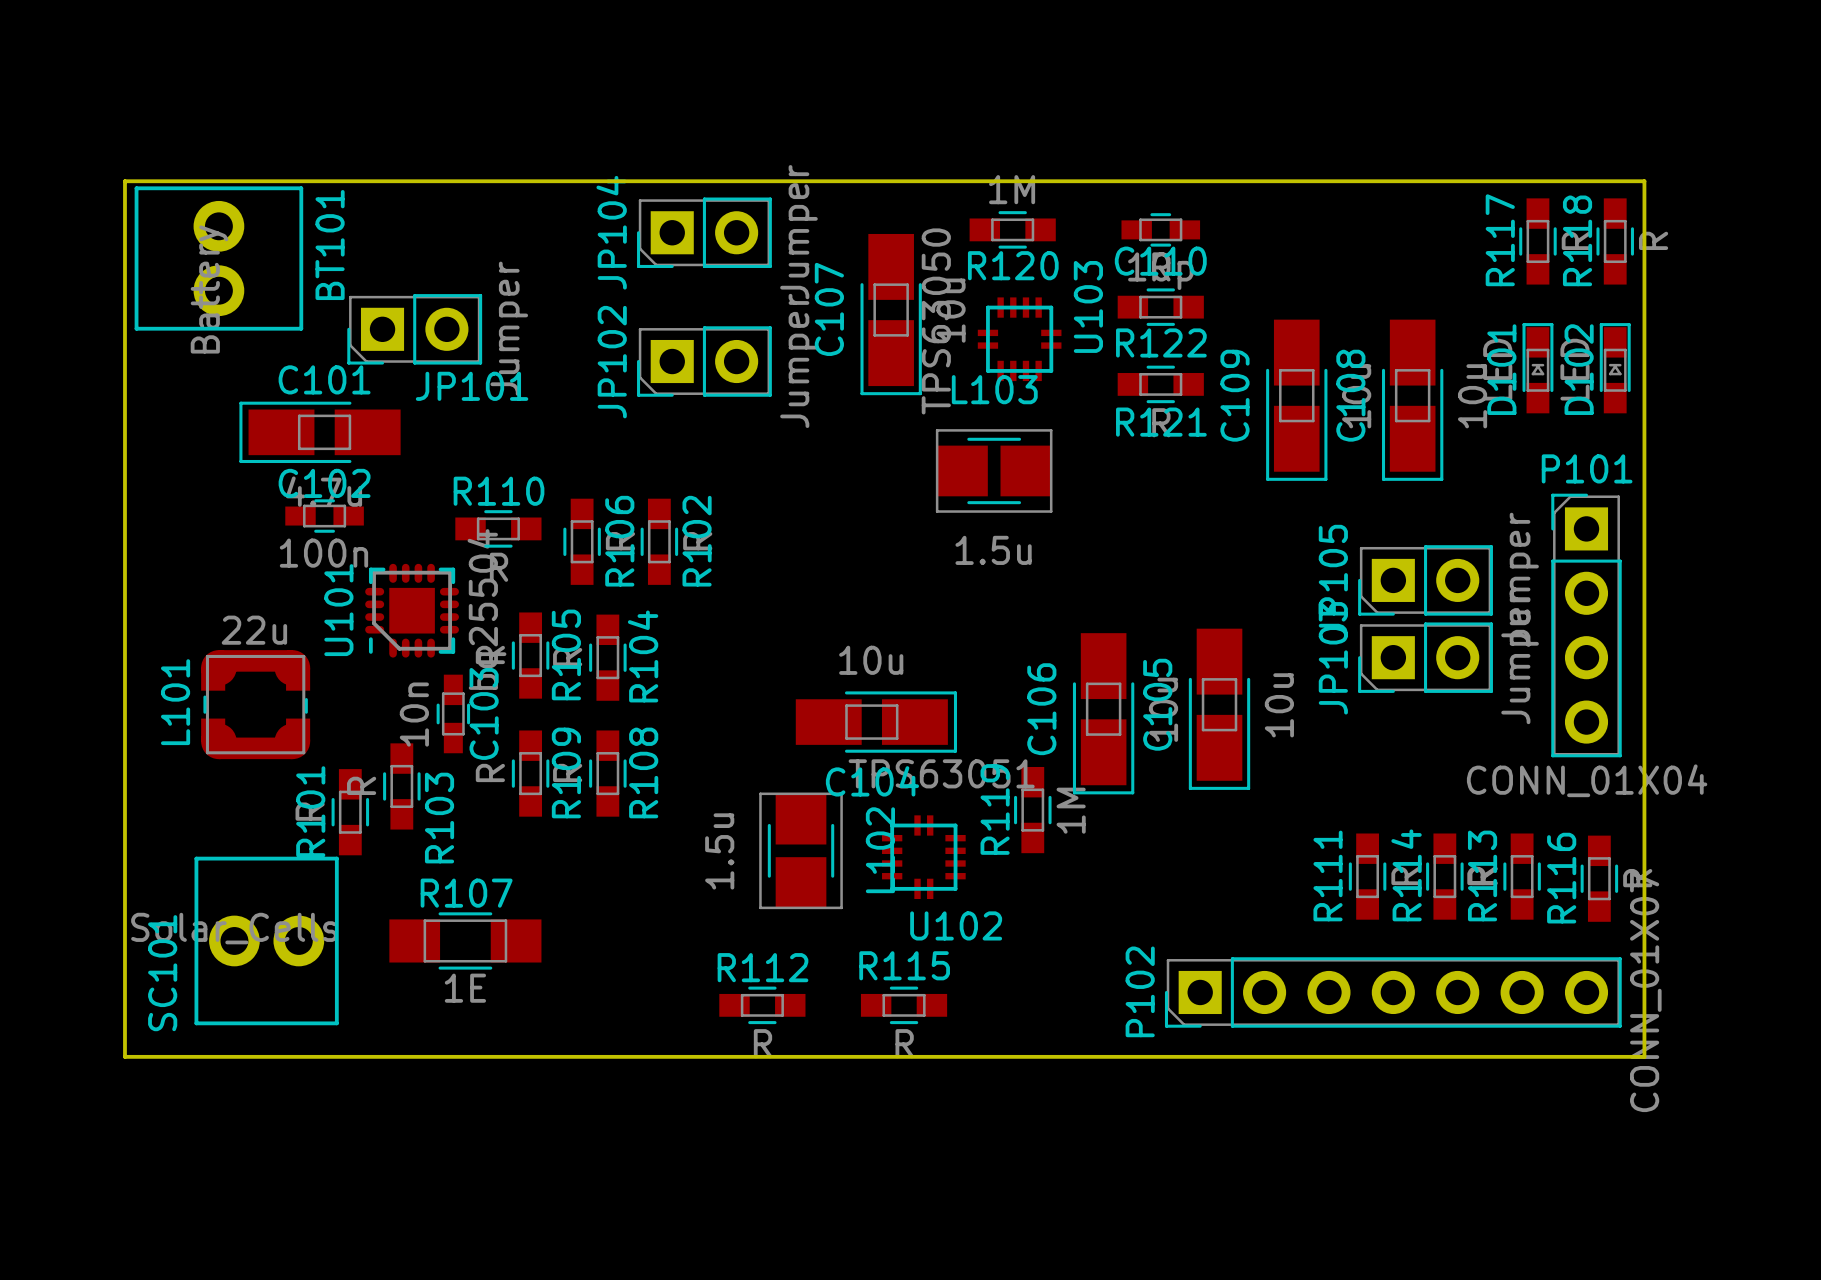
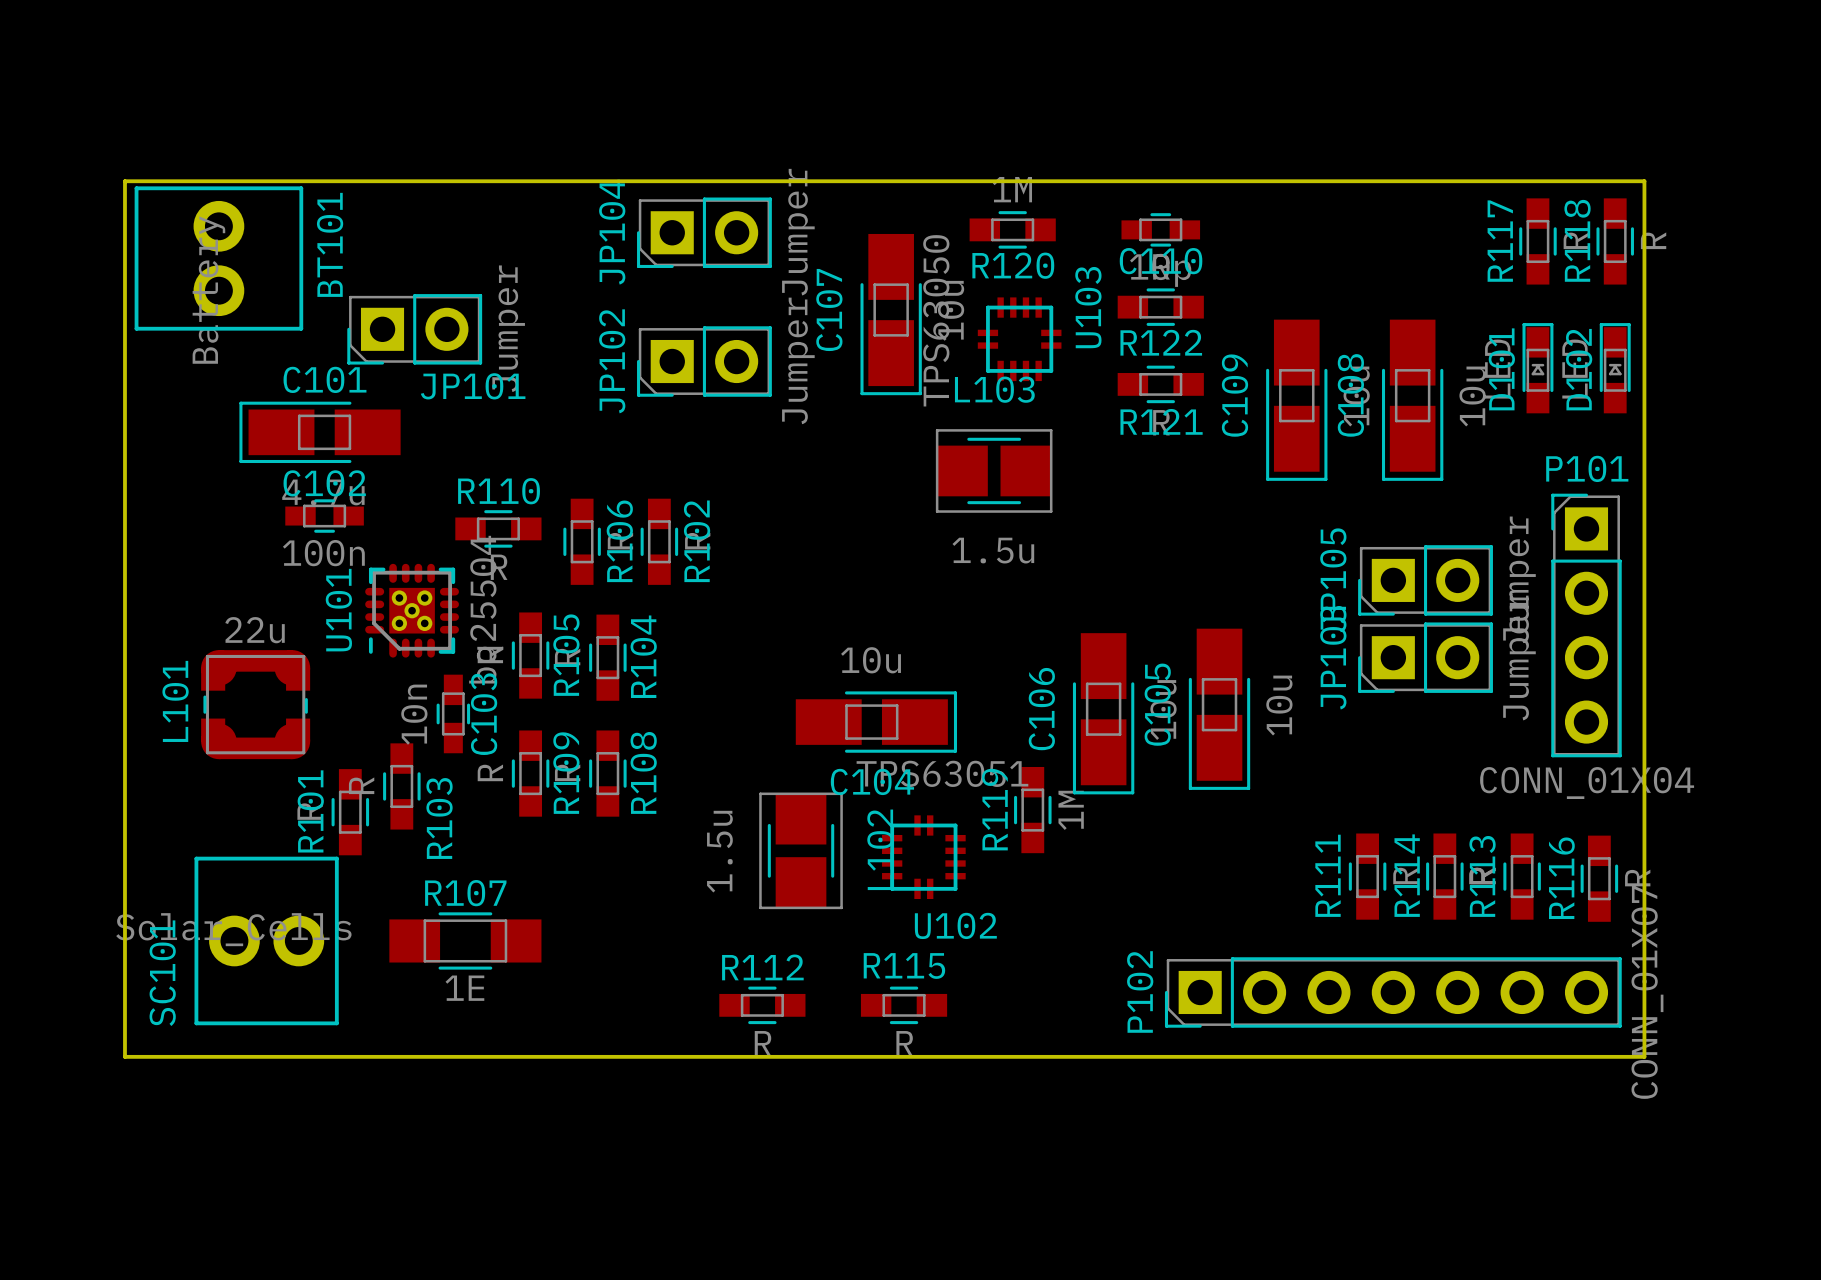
U101 footprint: [365, 563, 459, 658] -> [365, 563, 459, 658]

